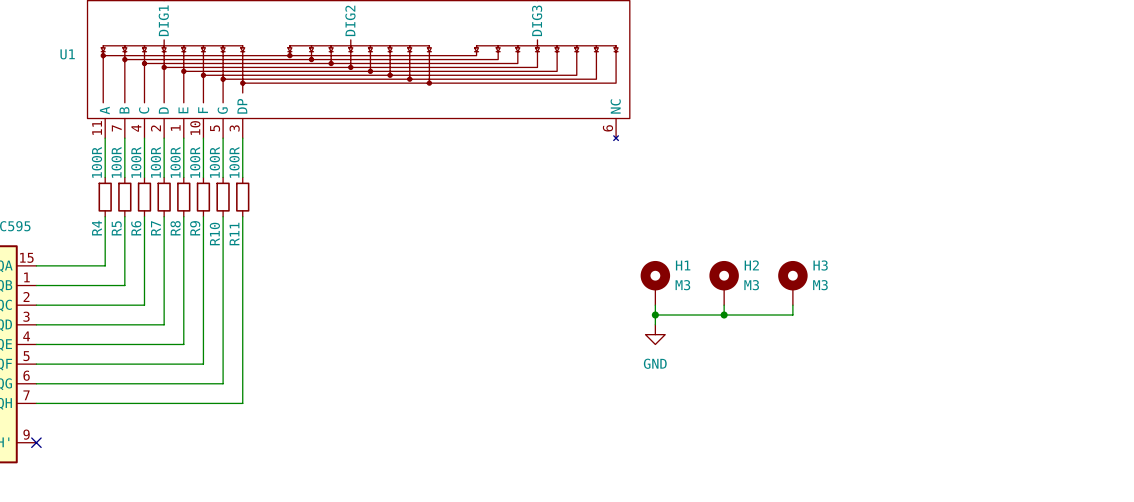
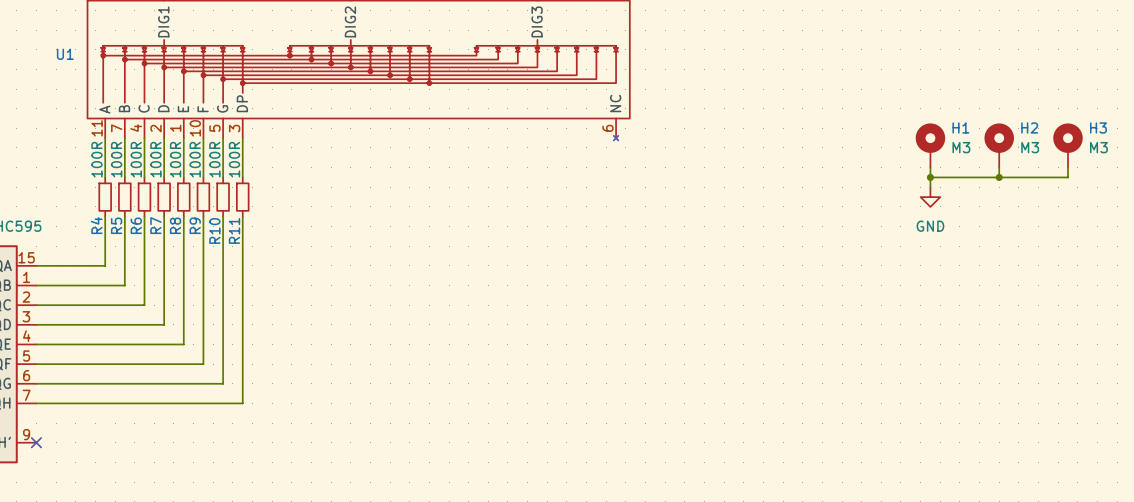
wire: none -> (930, 167) (930, 187)
wire: none -> (999, 167) (999, 177)
wire: none -> (1067, 167) (1067, 177) (930, 177)
junction: none -> (930, 177)
junction: none -> (999, 177)
power symbol: none -> GND (930, 197)
H1 position: (655, 283) -> (930, 145)
H2 position: (724, 283) -> (999, 145)
H3 position: (792, 283) -> (1067, 145)
wire: (655, 305) (655, 324) -> none
wire: (724, 305) (724, 315) -> none
wire: (792, 305) (792, 315) (655, 315) -> none
junction: (655, 315) -> none
junction: (724, 315) -> none
power symbol: GND (655, 334) -> none

